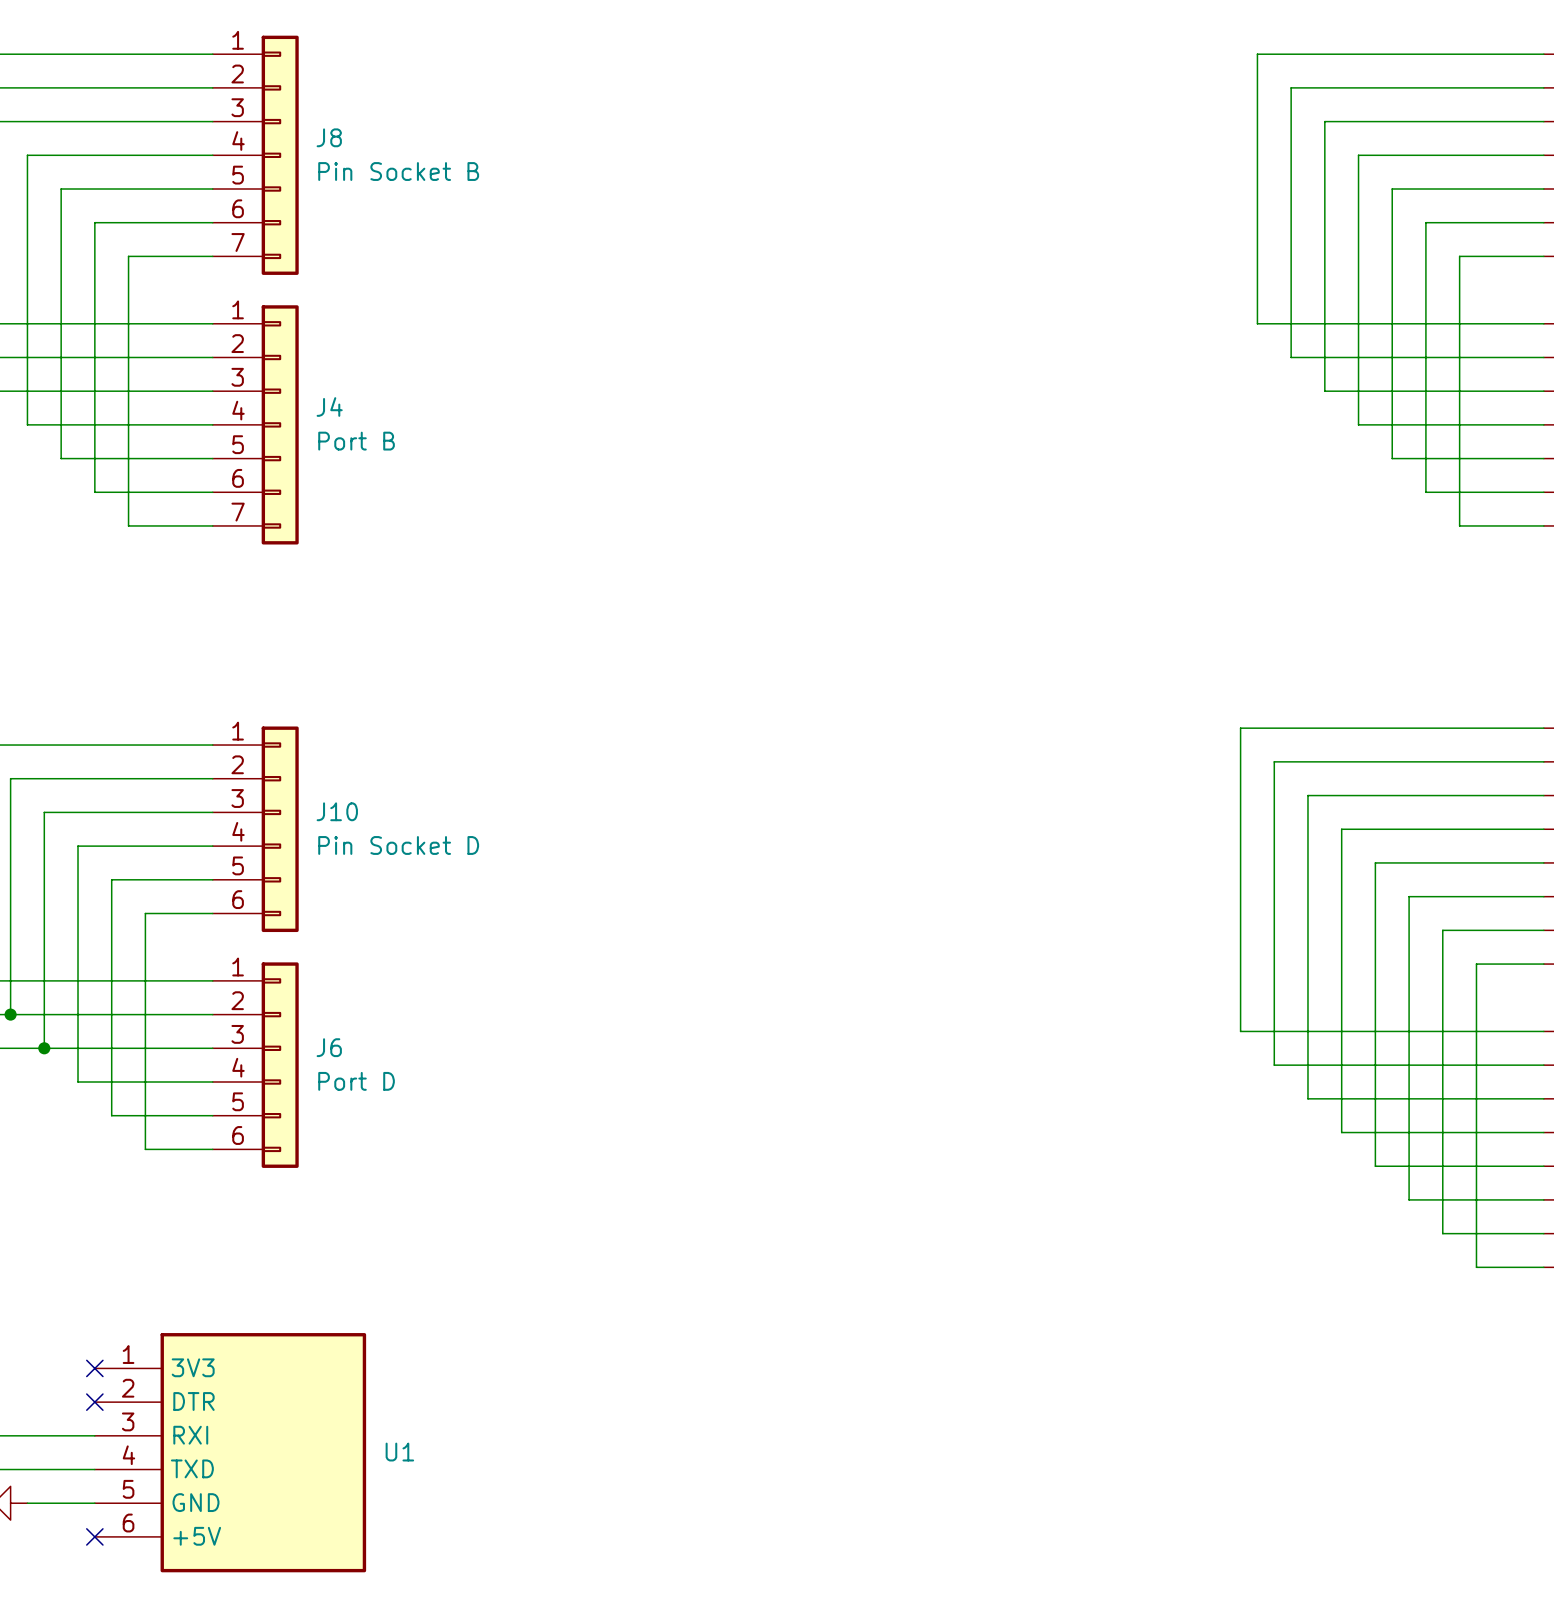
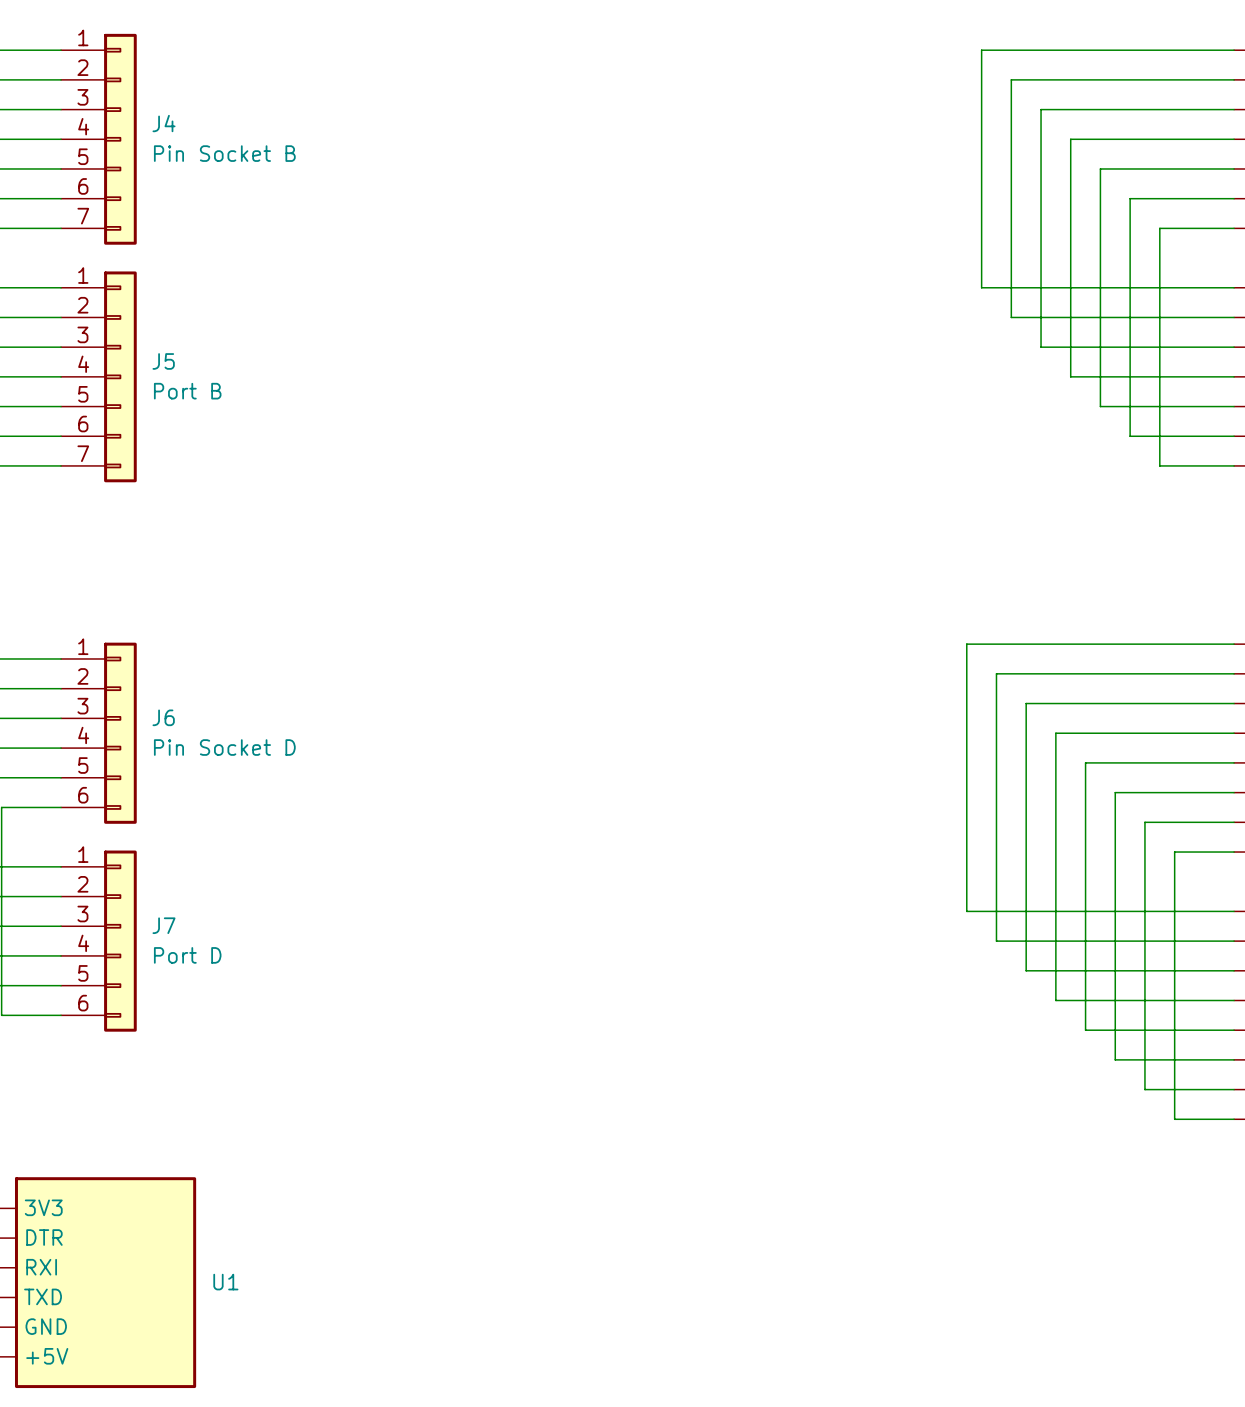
J8 name: J8 (329, 137) -> J4 (164, 123)
J4 name: J4 (329, 407) -> J5 (163, 361)
J10 name: J10 (337, 811) -> J6 (163, 717)
J6 name: J6 (329, 1047) -> J7 (164, 925)

